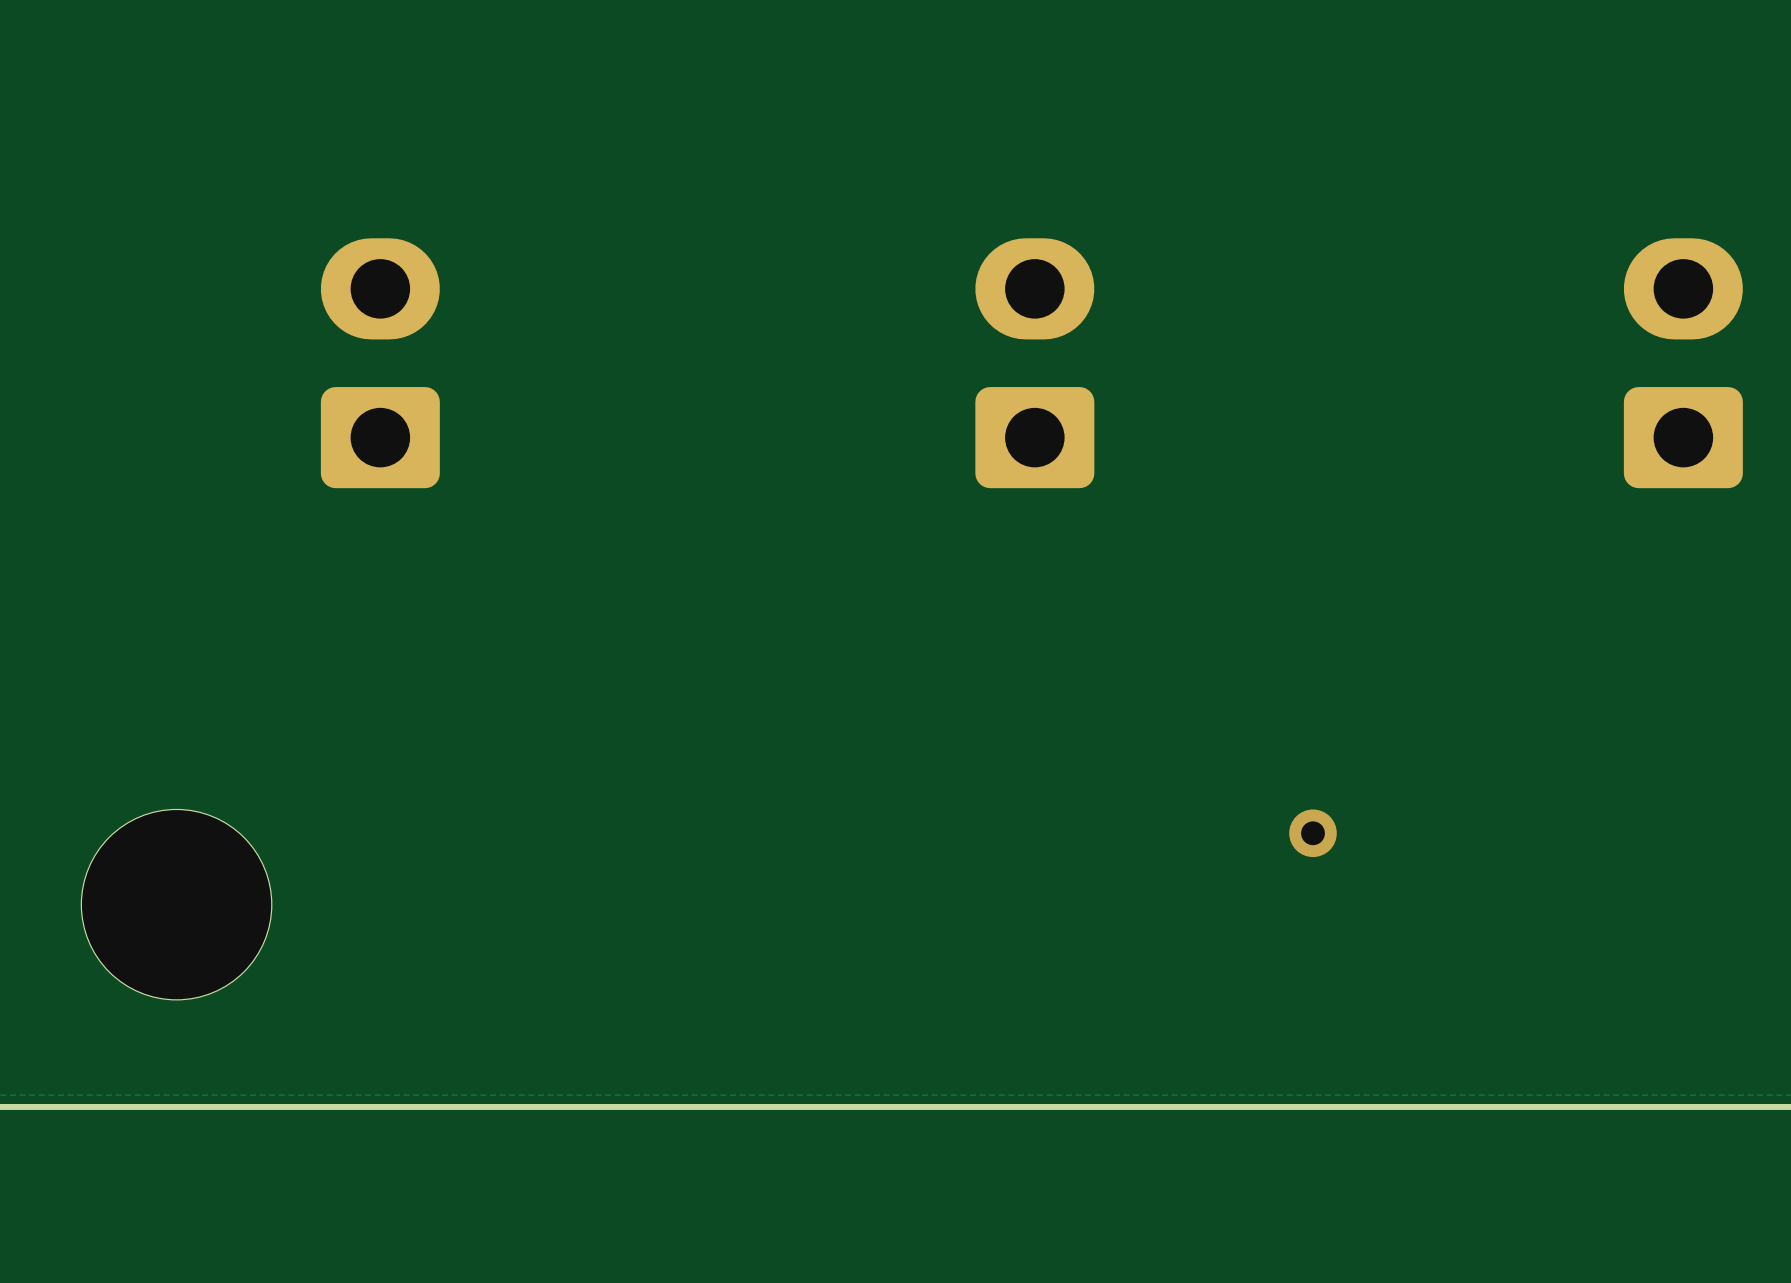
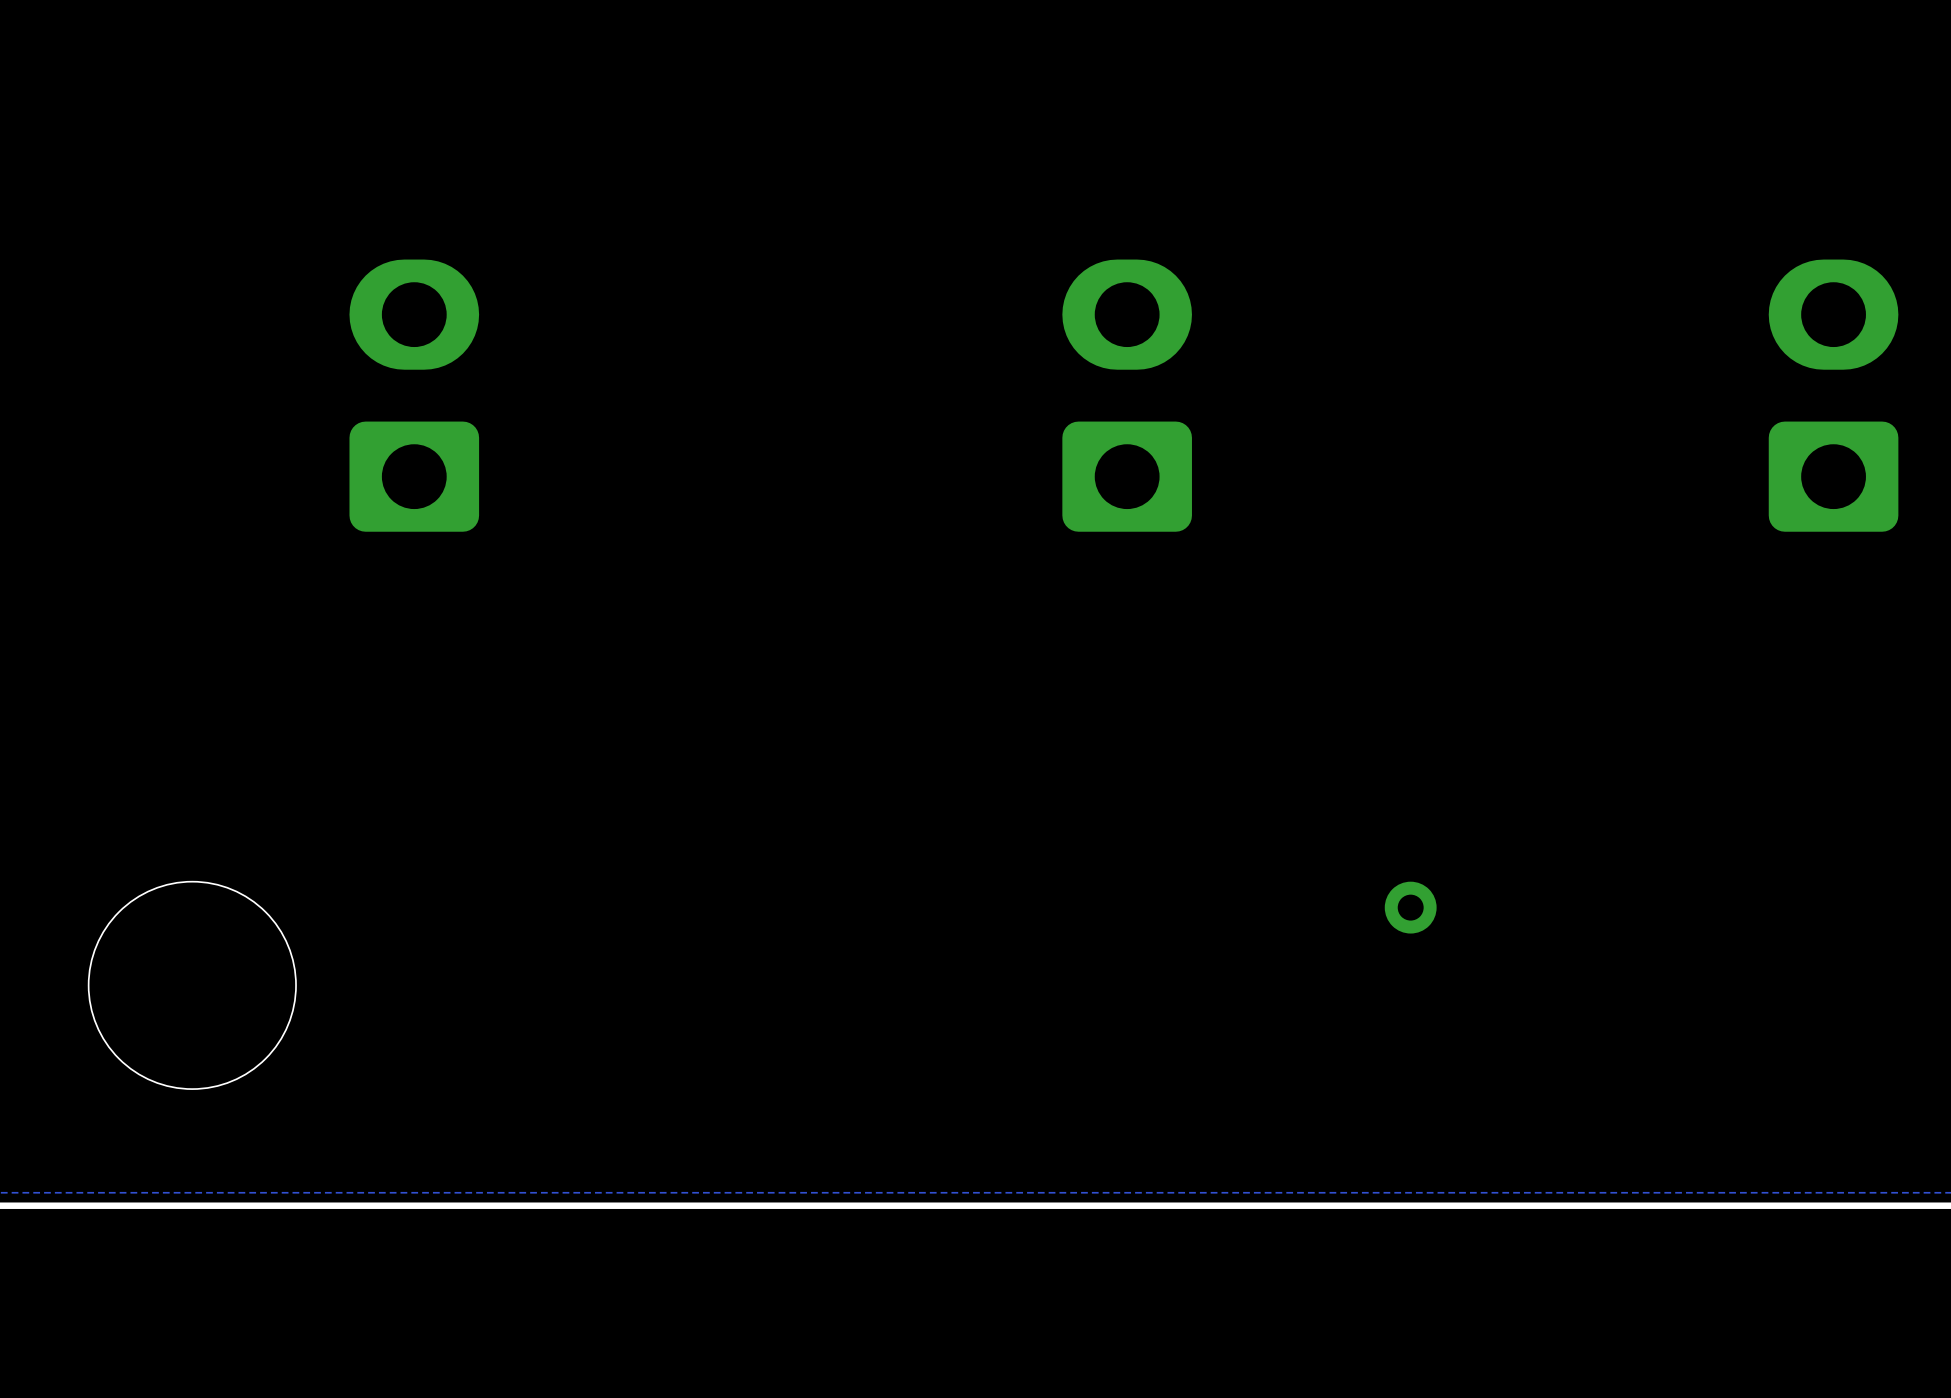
via position: (1313, 833) -> (1410, 907)

